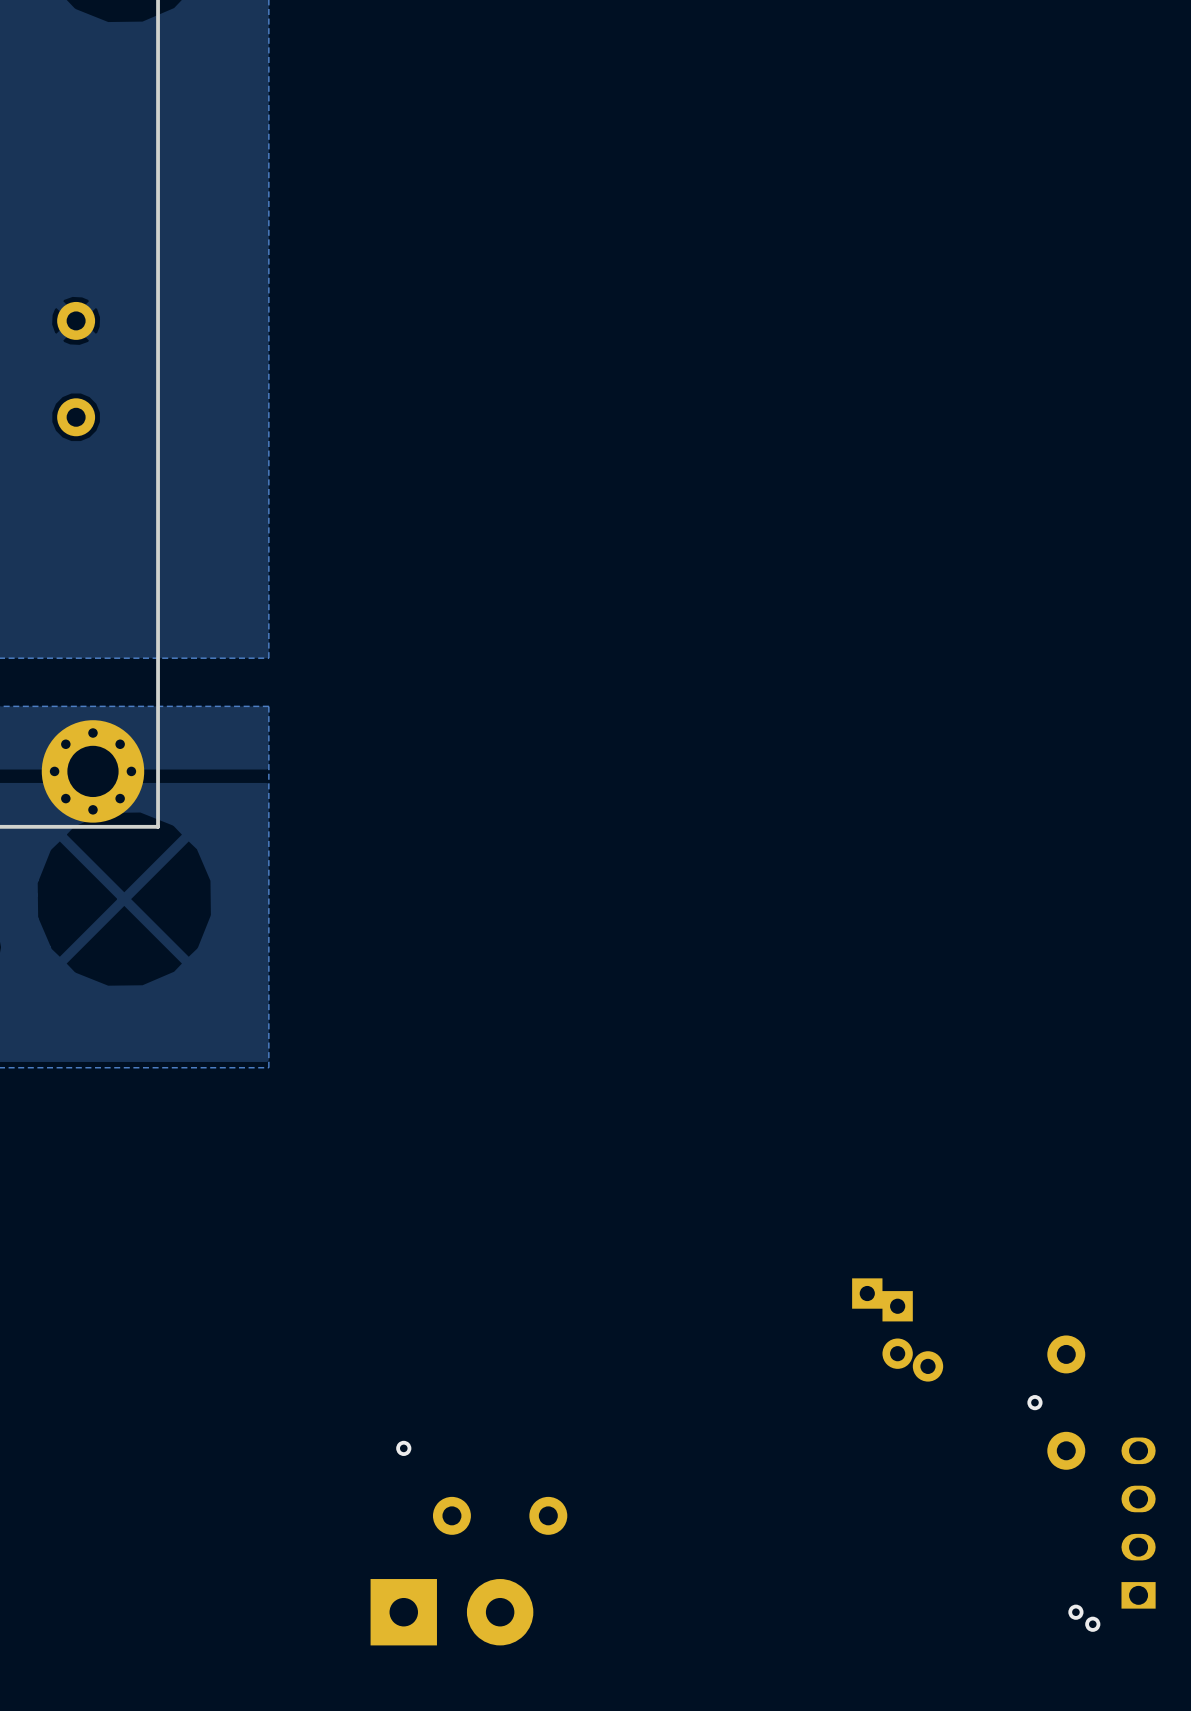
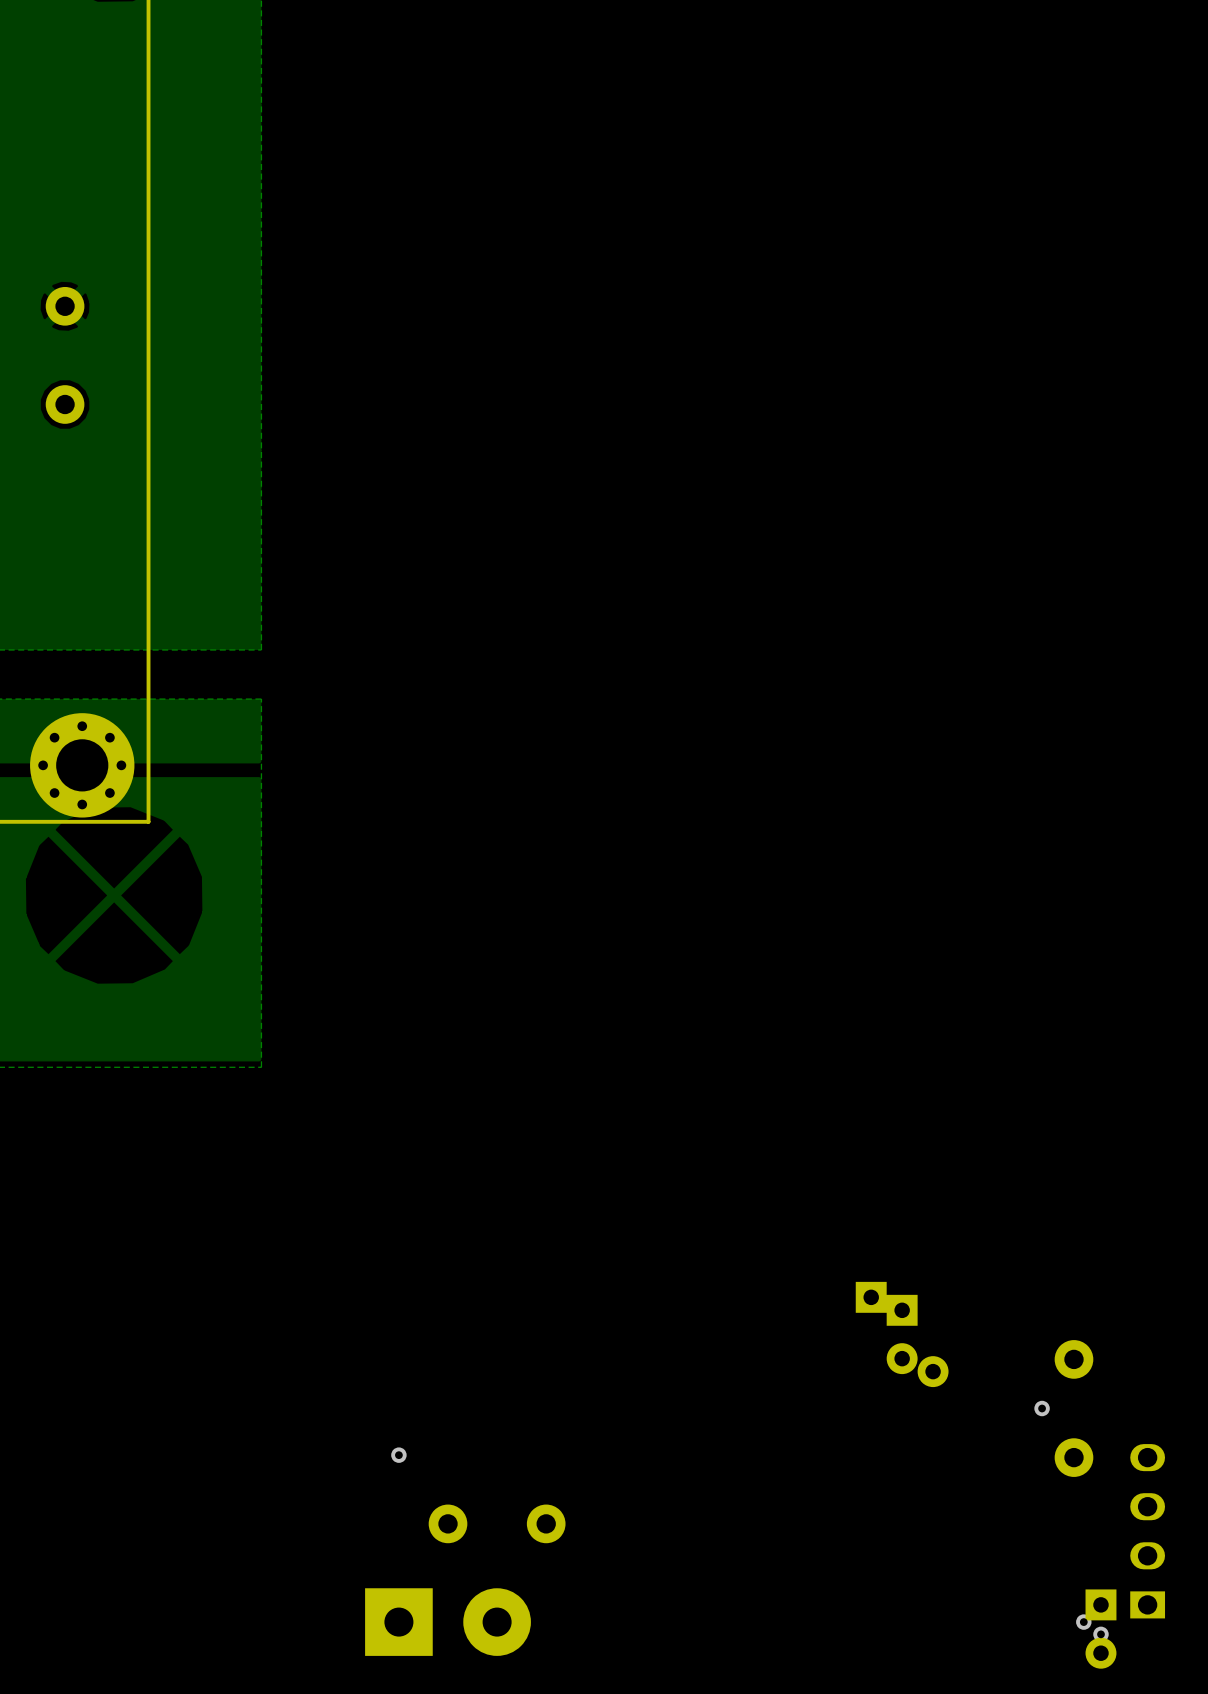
part: none -> (1100, 1629)

